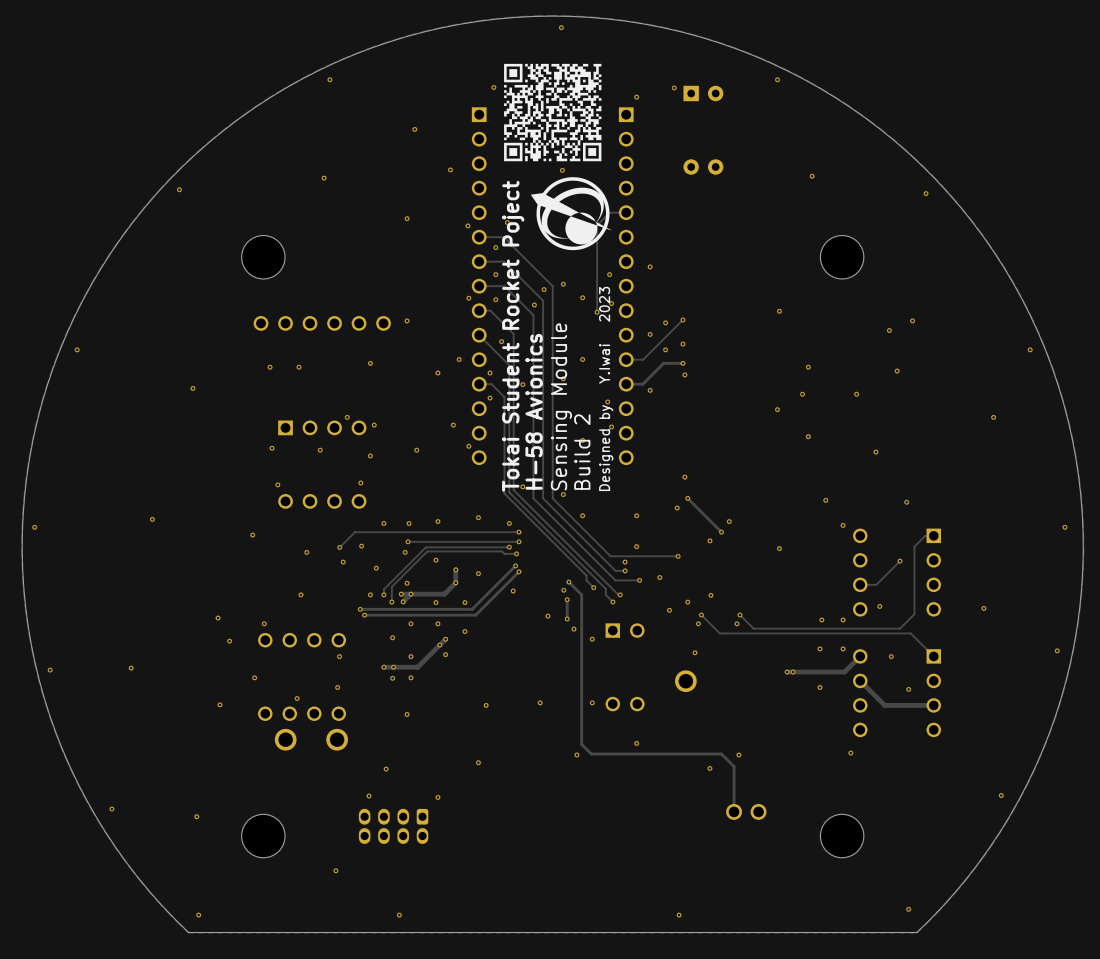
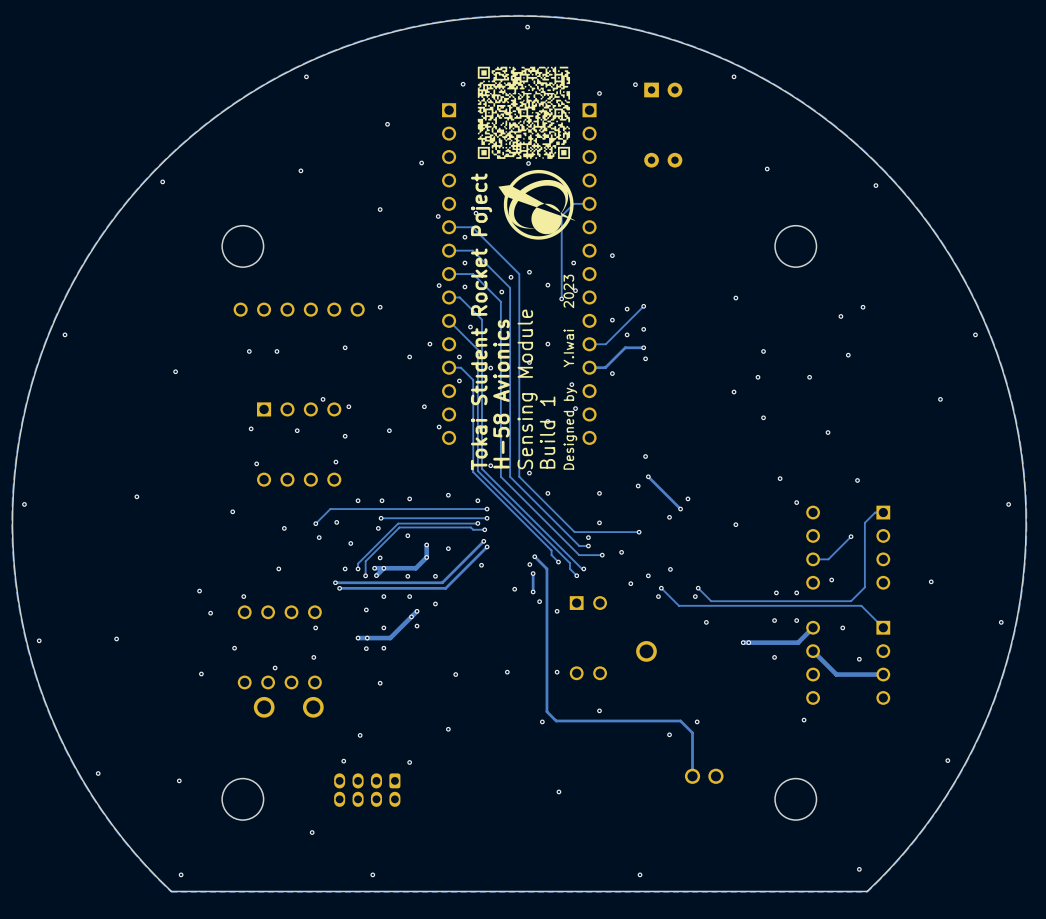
drawing shape: [504, 63, 602, 162] -> [477, 66, 571, 159]
text: Build 2 (582, 452) -> Build 1 (547, 432)
via position: (695, 652) -> (706, 622)
via: none -> (558, 791)

